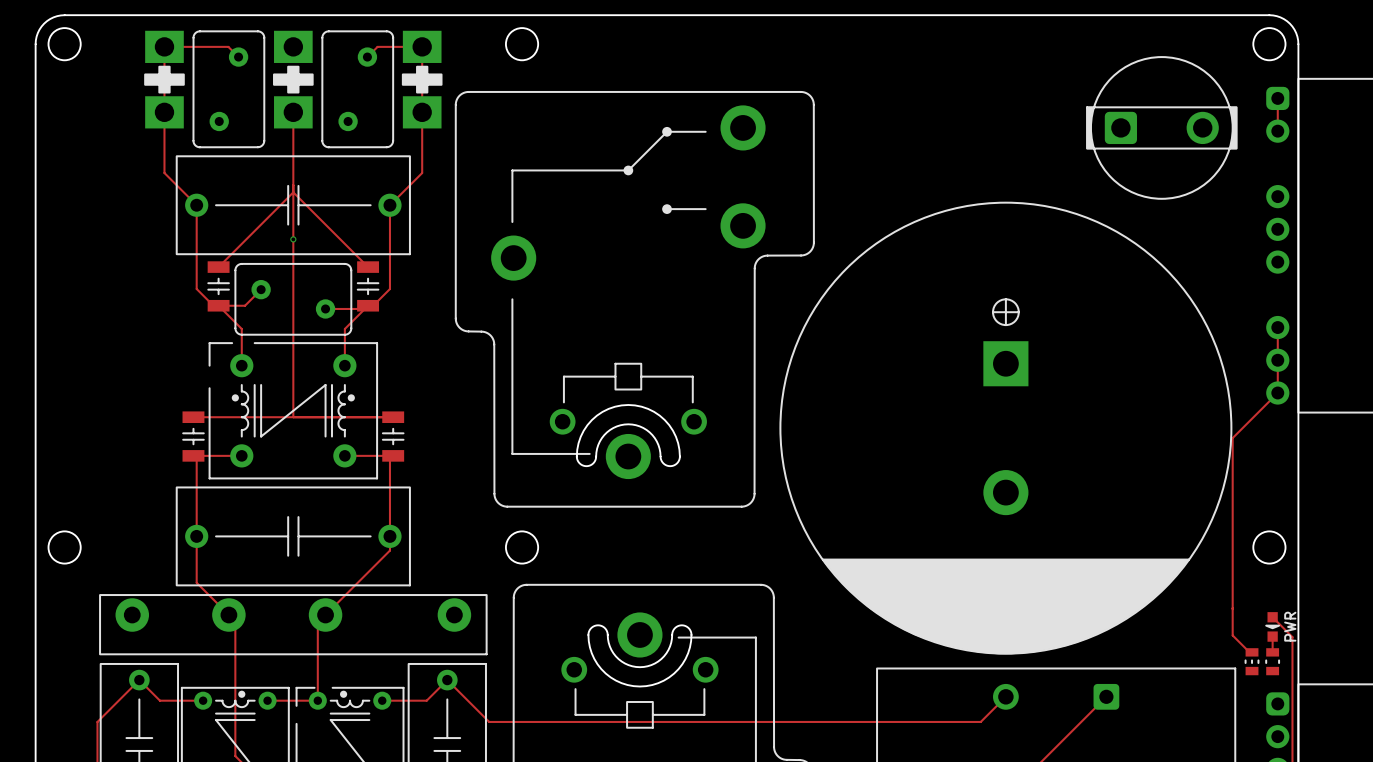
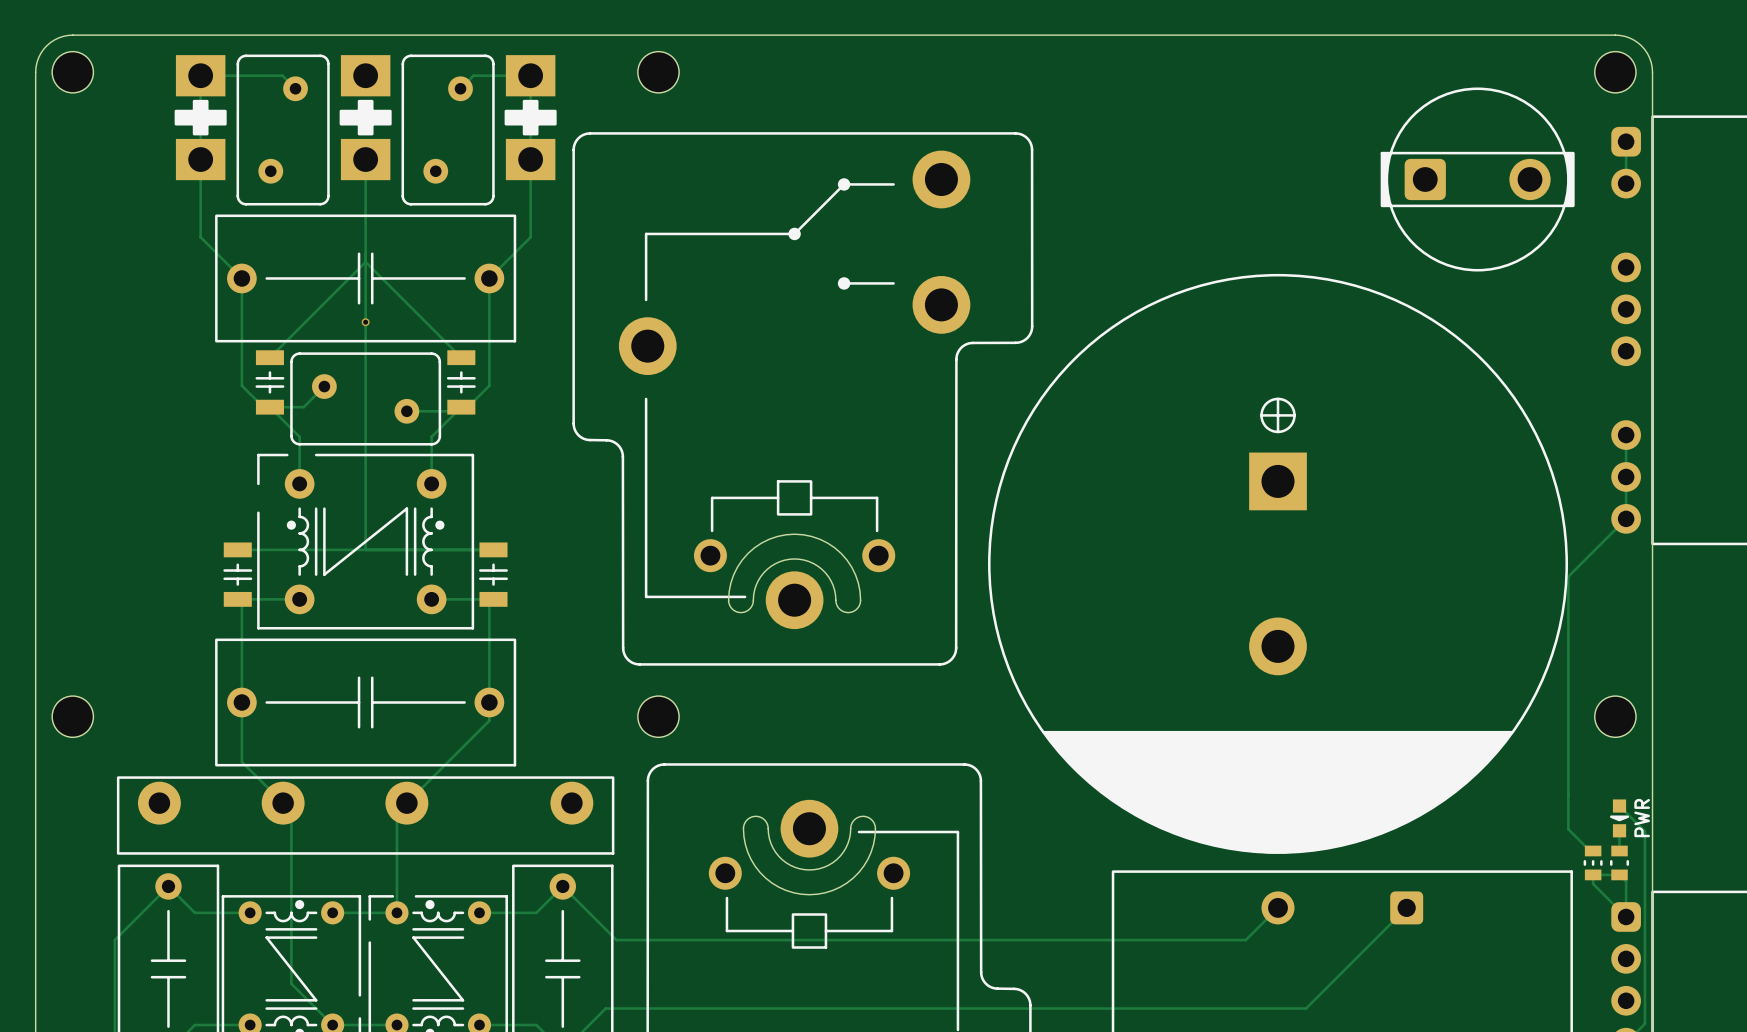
track: none -> (1593, 874) (1619, 874) (1626, 881) (1626, 916) (1593, 883) (1593, 874)

